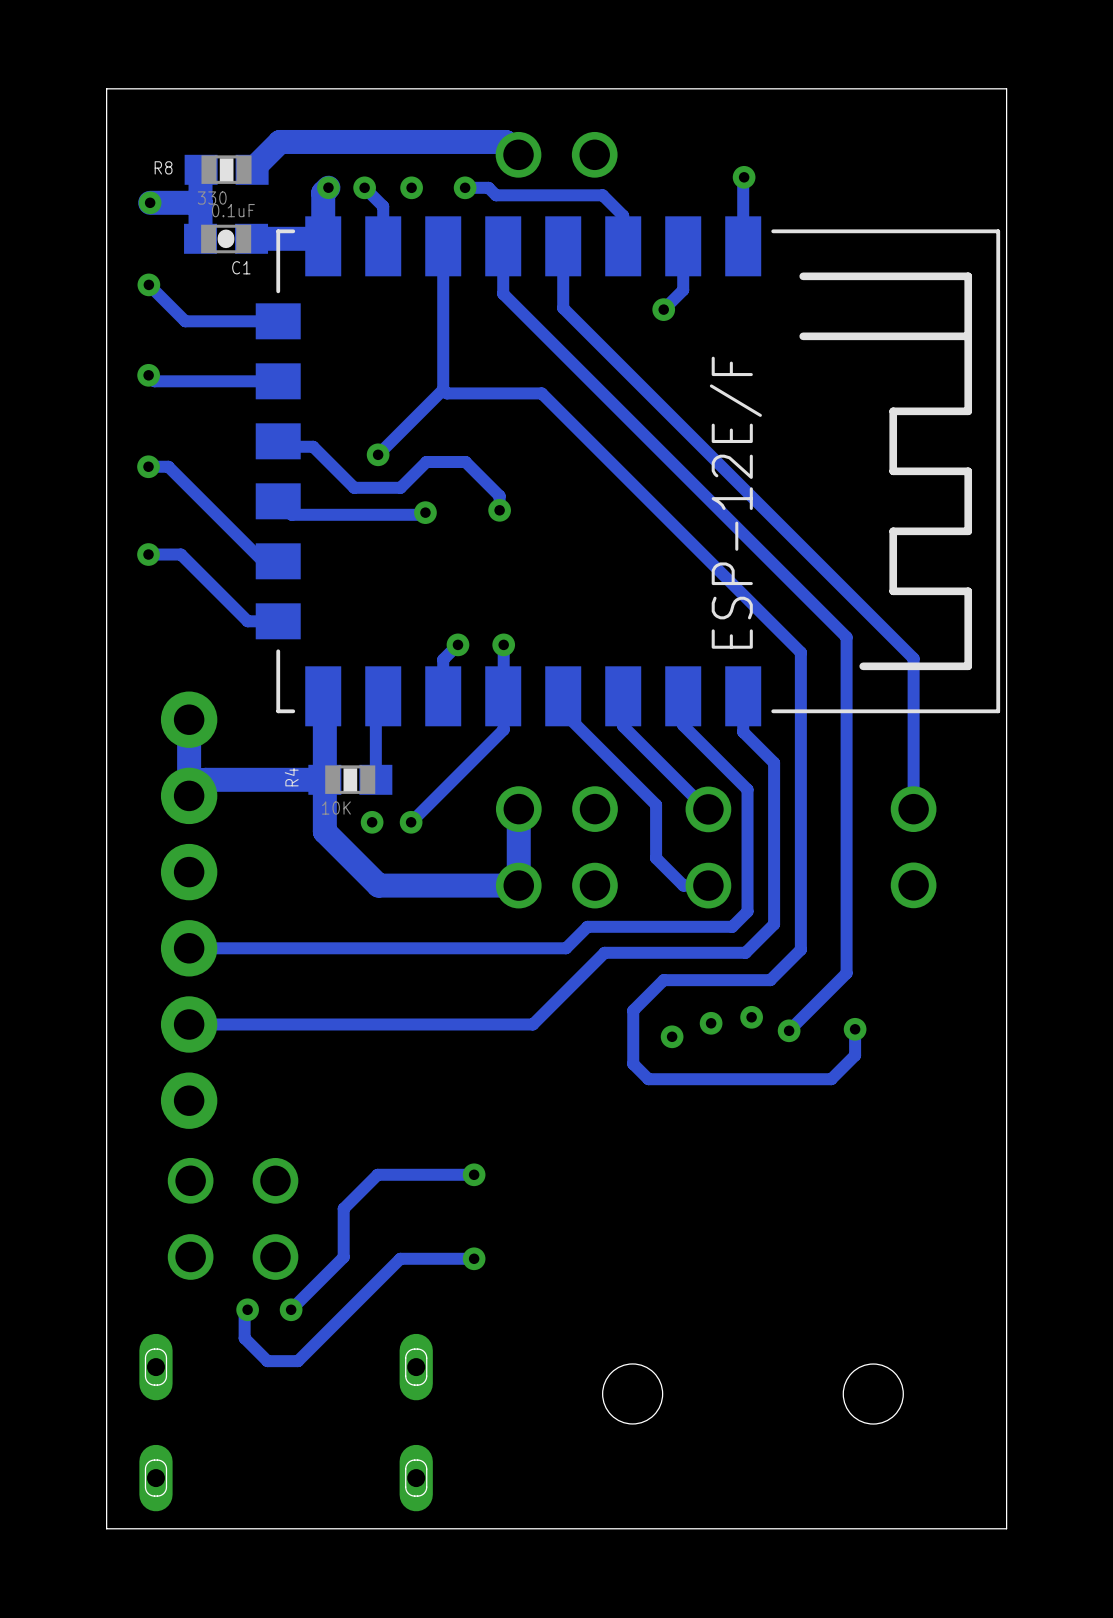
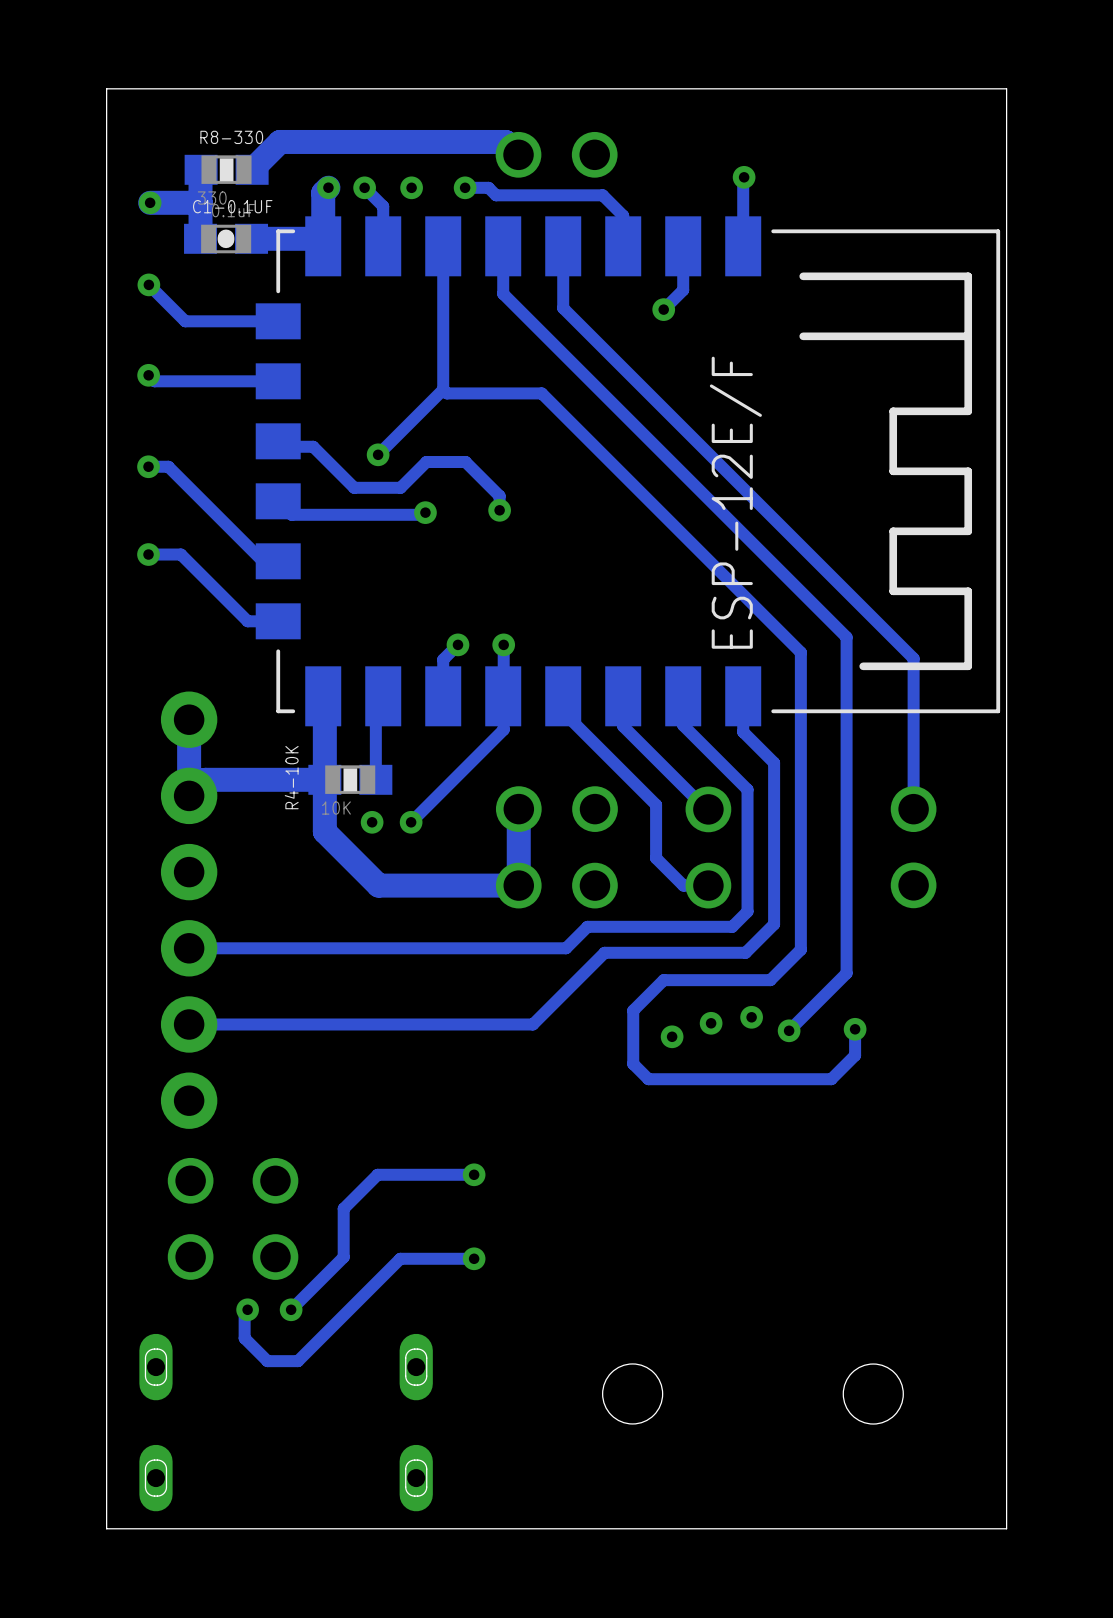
R8 name: R8 (163, 167) -> R8-330 (231, 137)
C1 name: C1 (241, 267) -> C1-0.1UF (232, 206)
R4 name: R4 (291, 777) -> R4-10K (291, 777)

